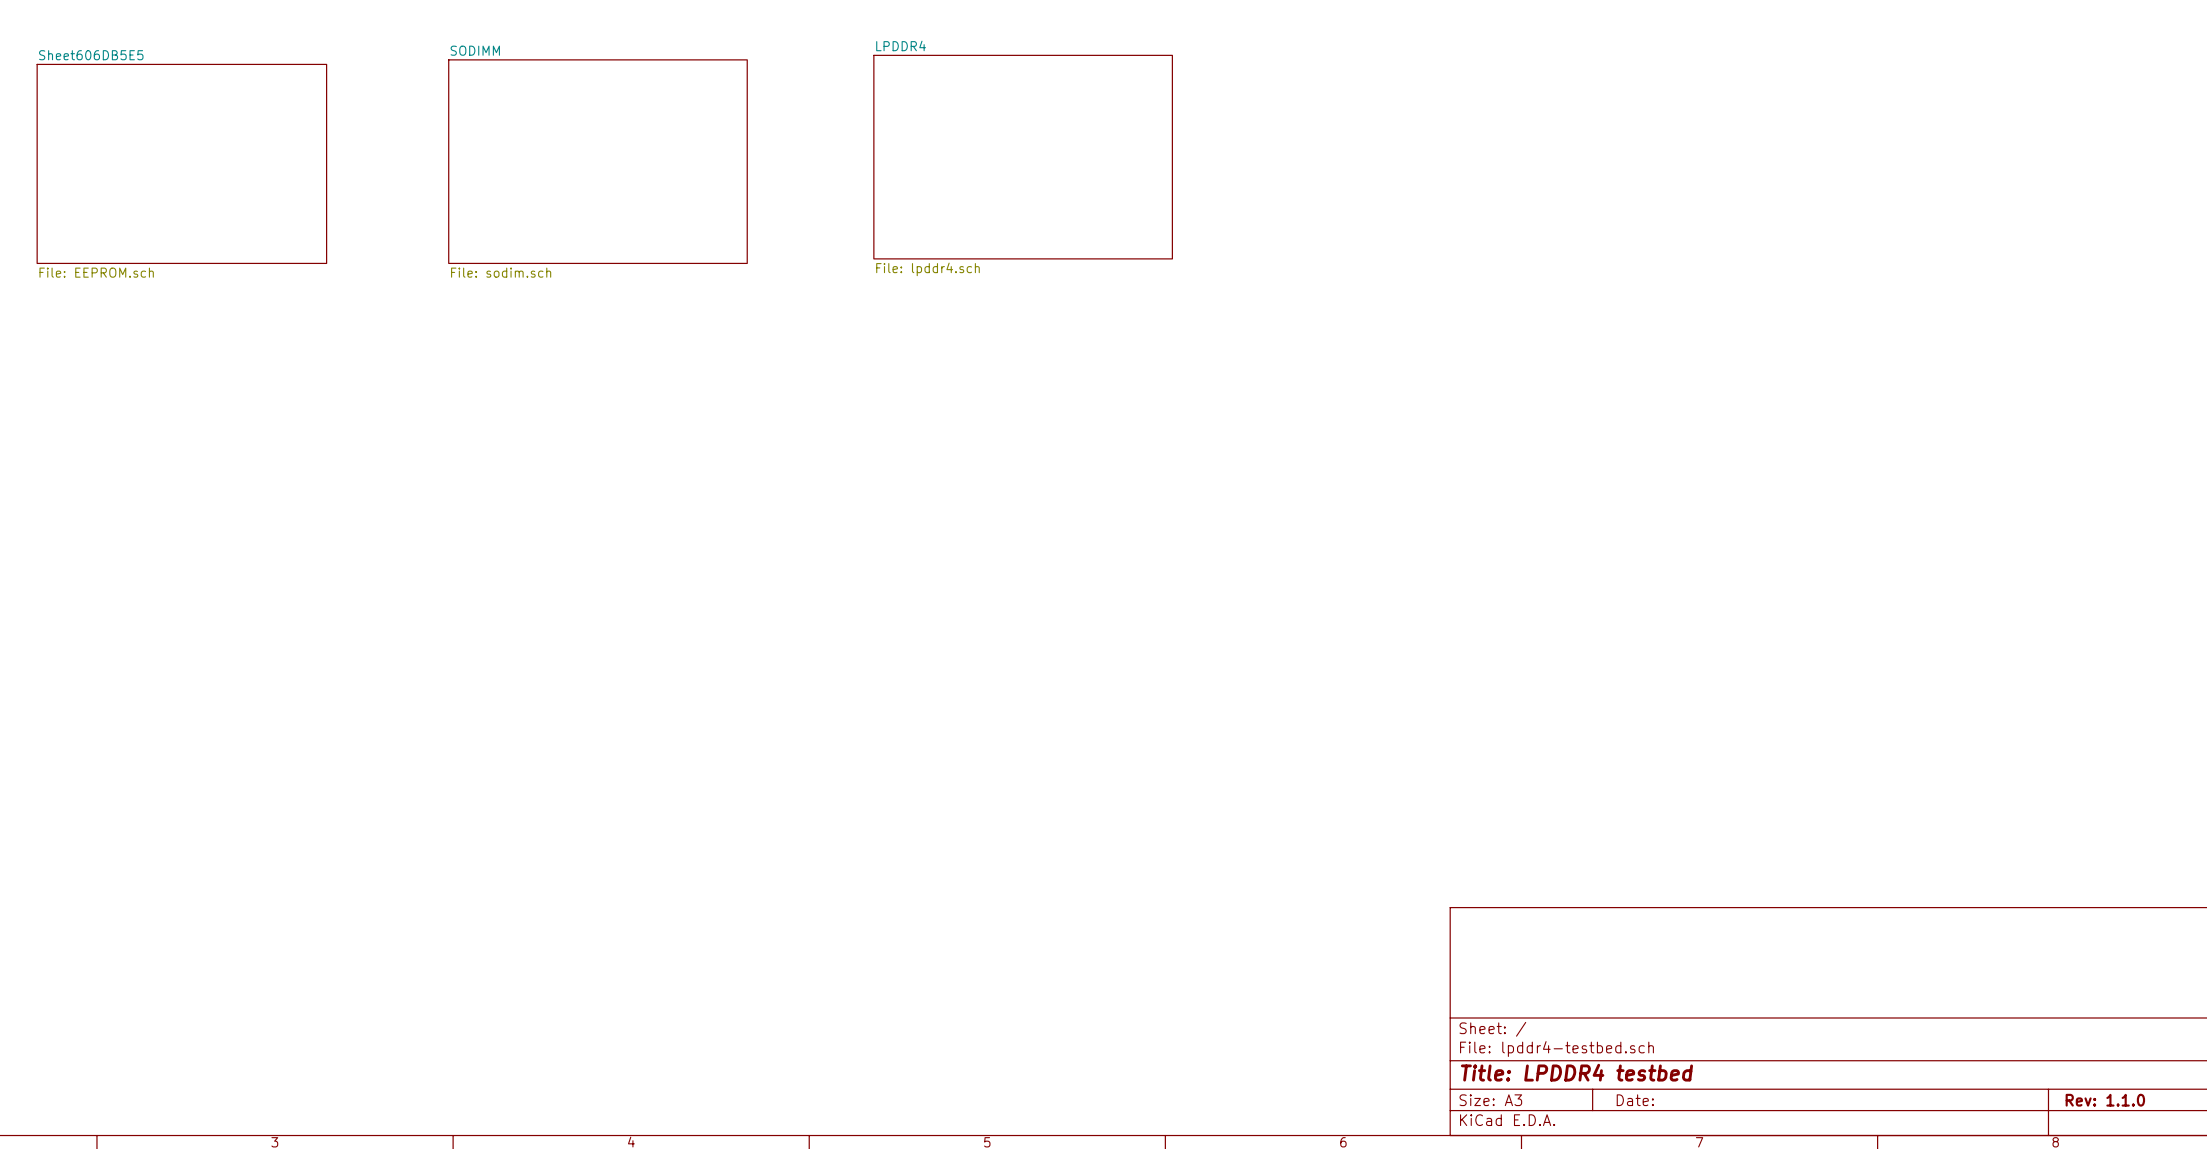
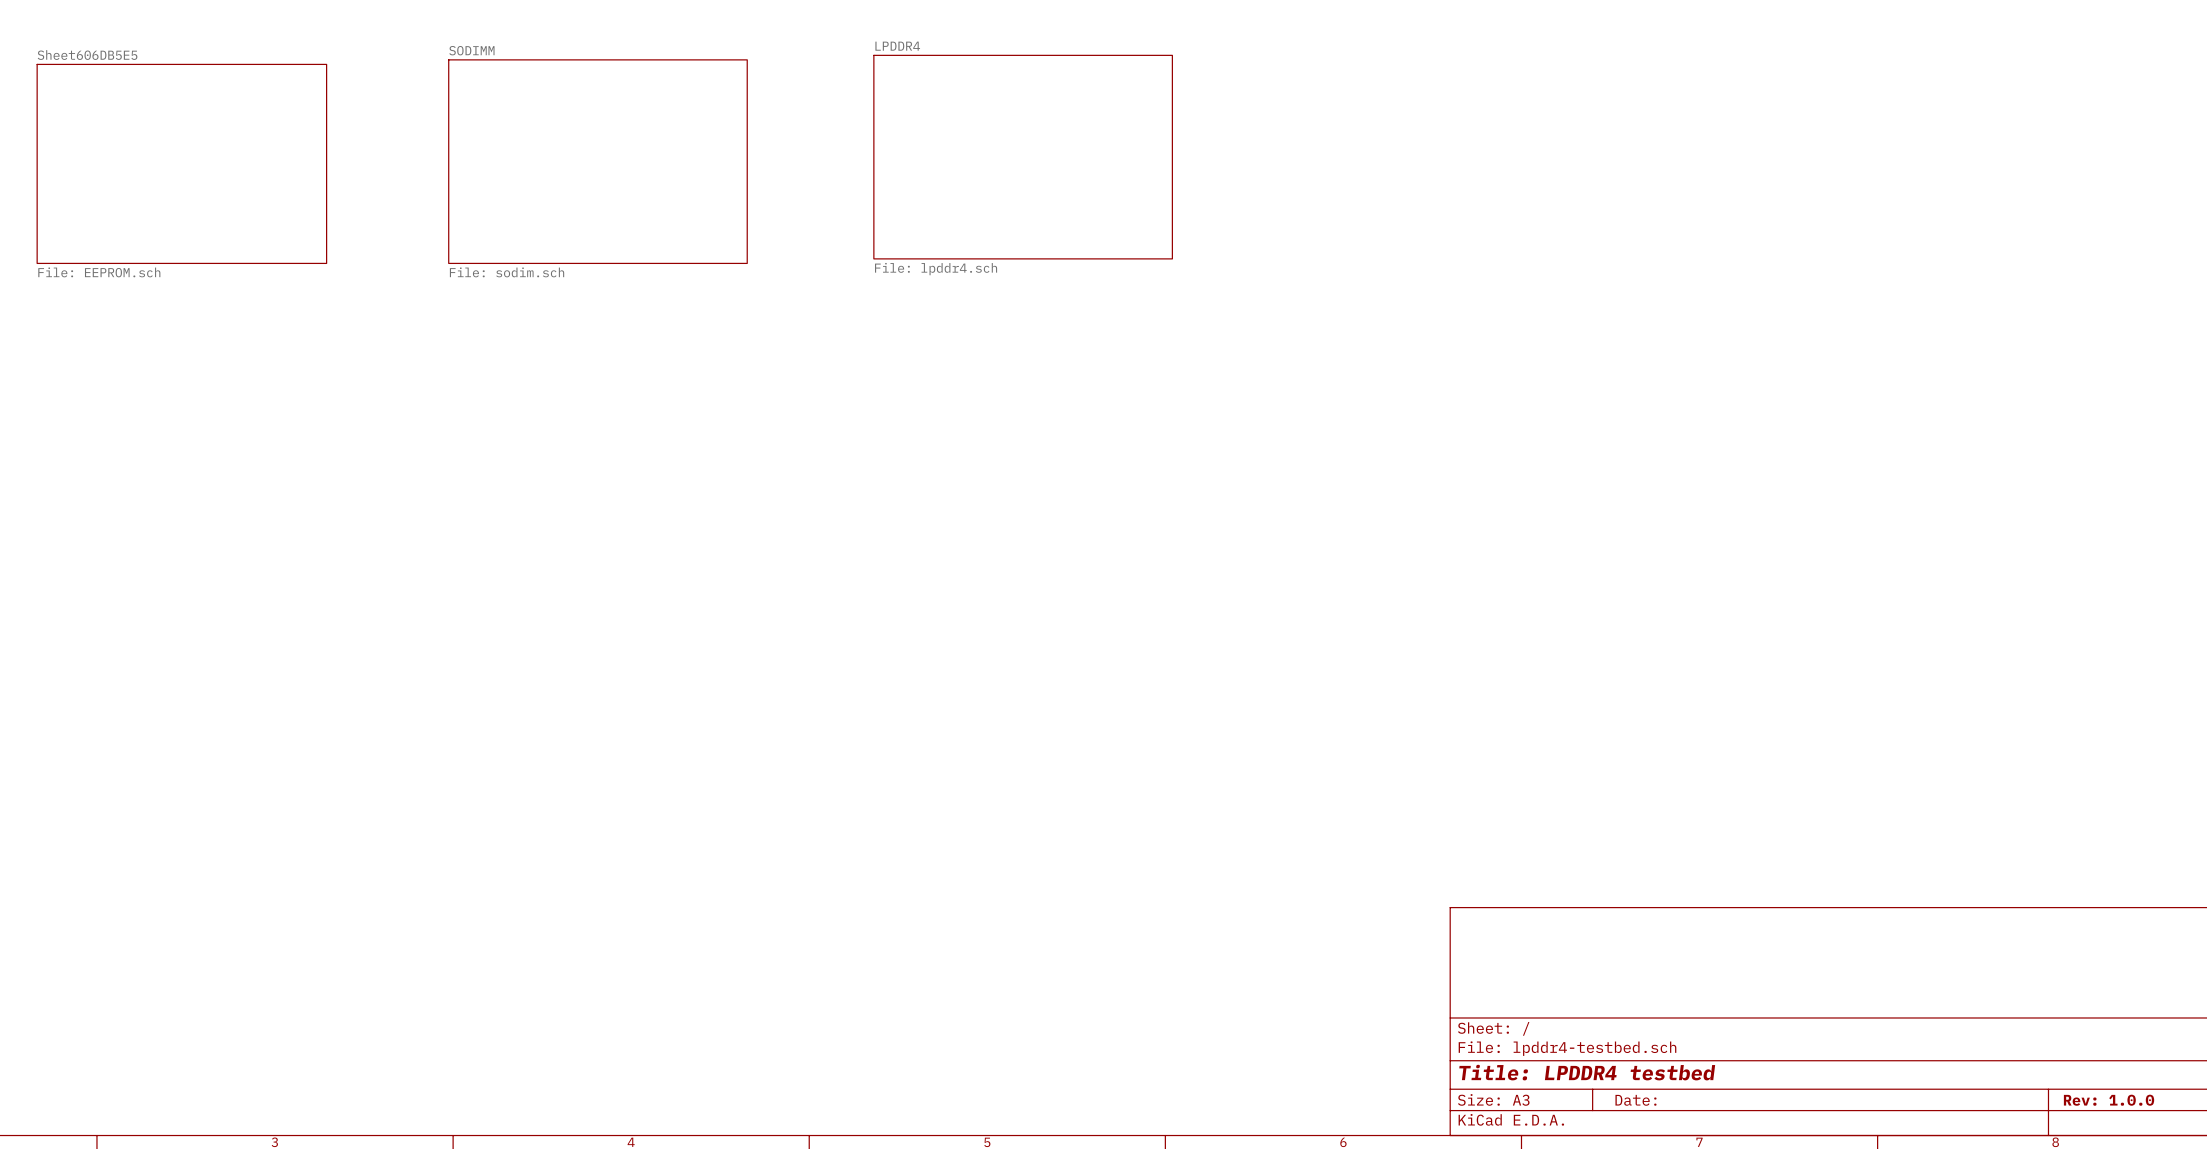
title block: Rev: 1.1.0 (2105, 1100) -> Rev: 1.0.0 (2109, 1100)

